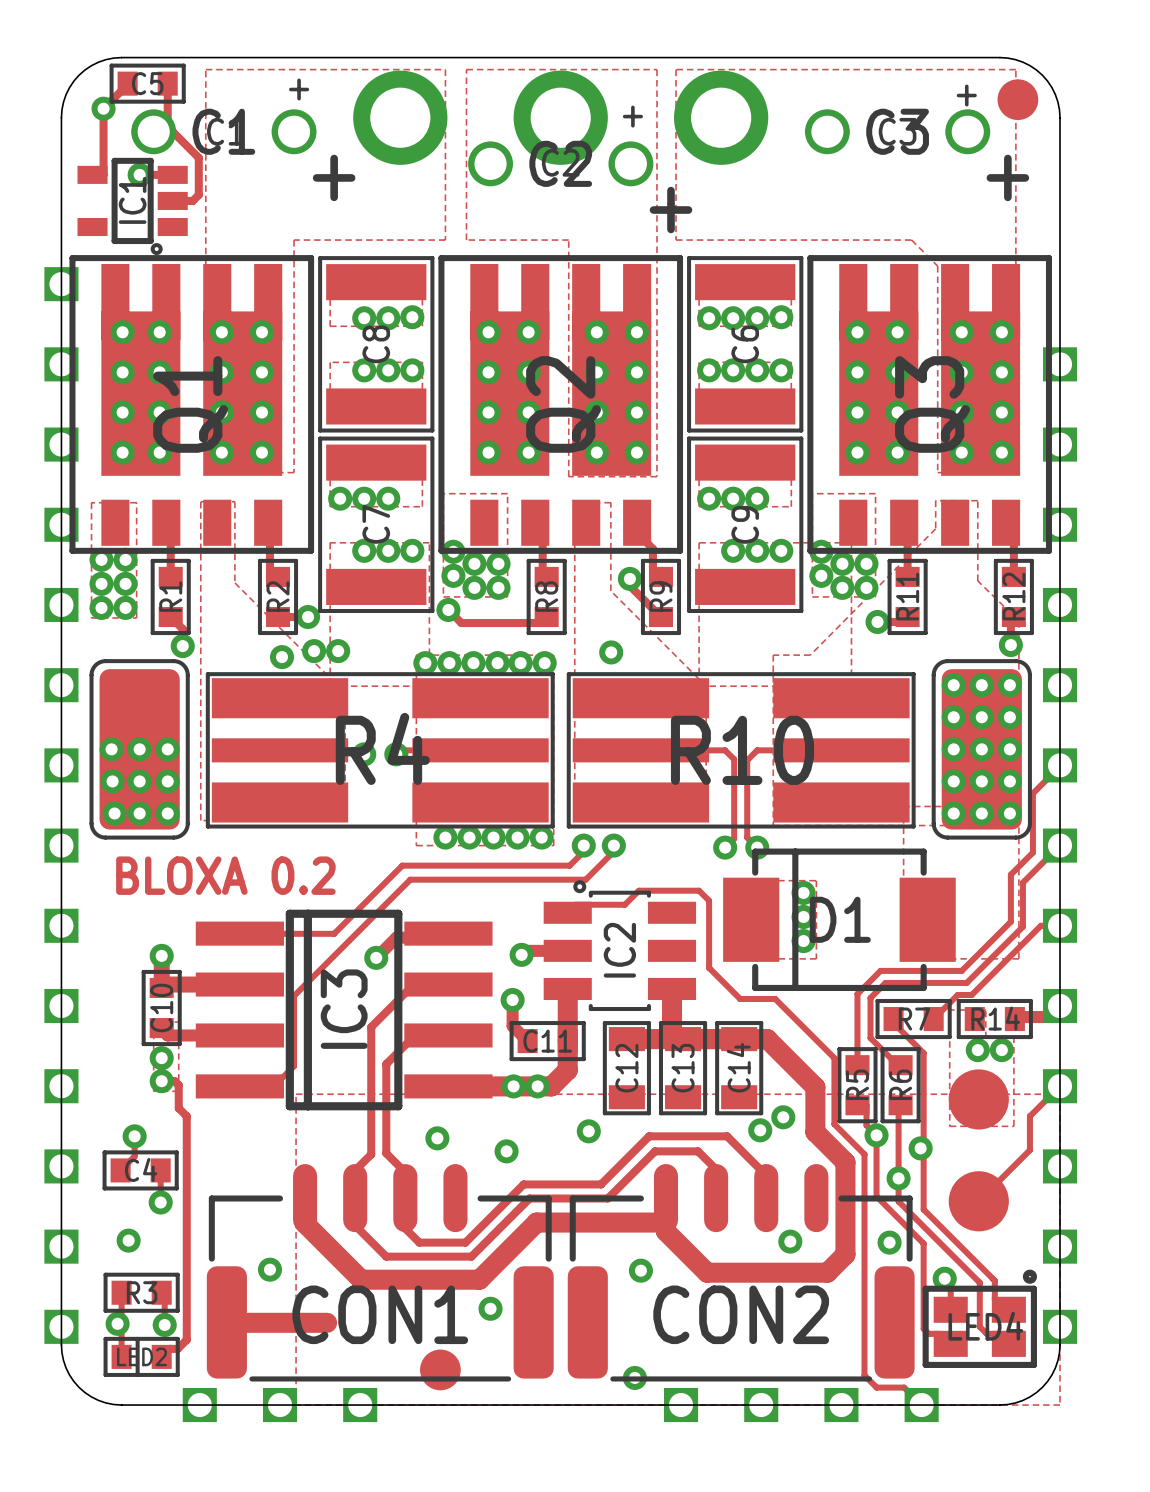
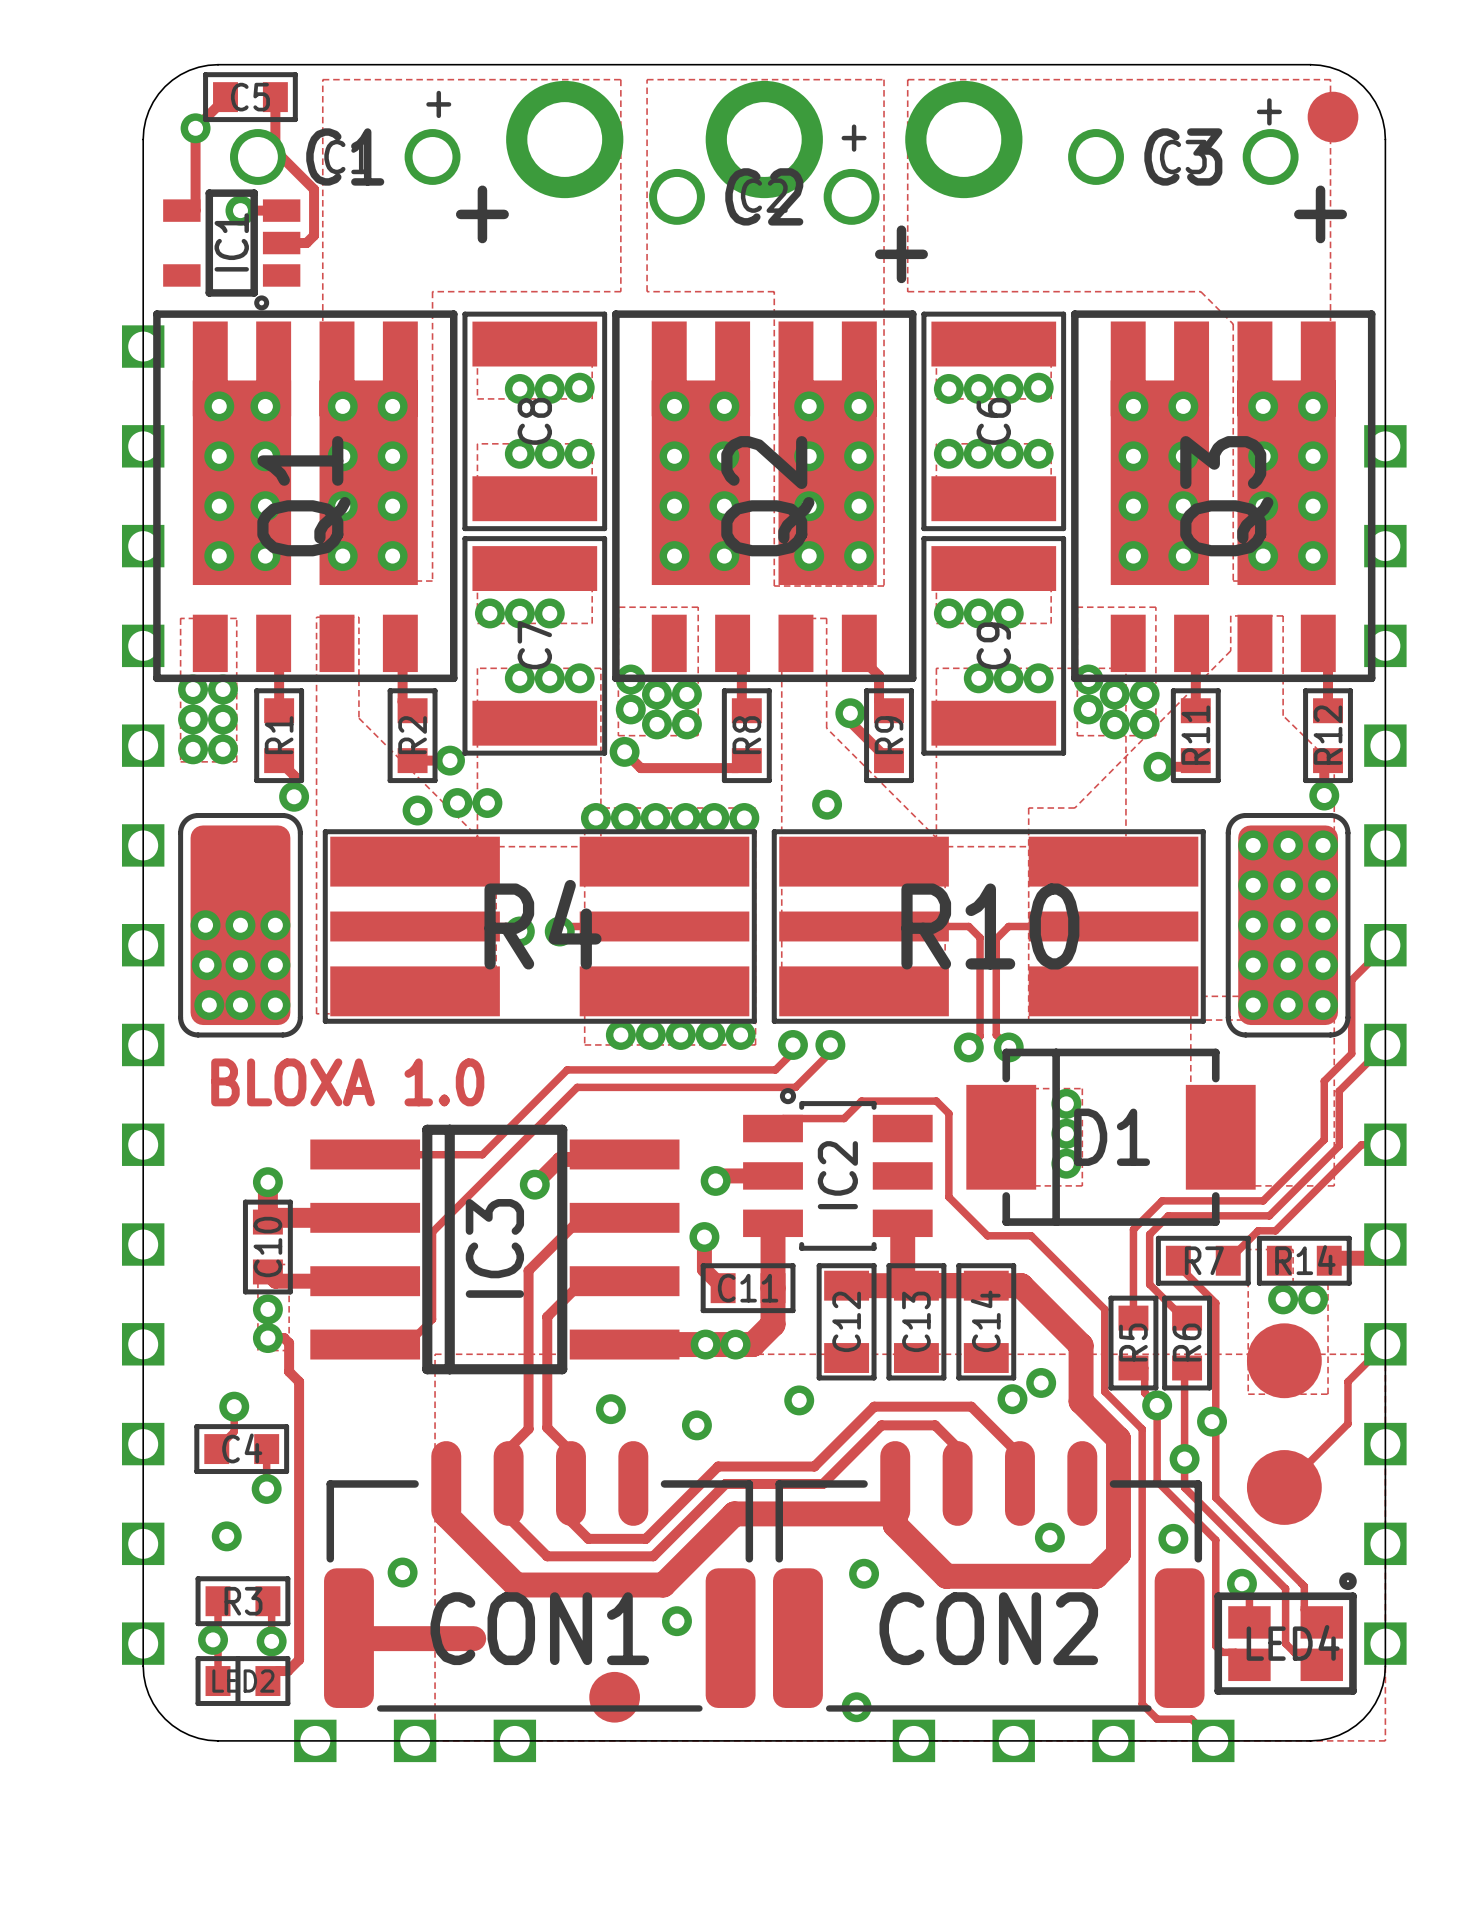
text: BLOXA 0.2 (225, 875) -> BLOXA 1.0 (347, 1082)

